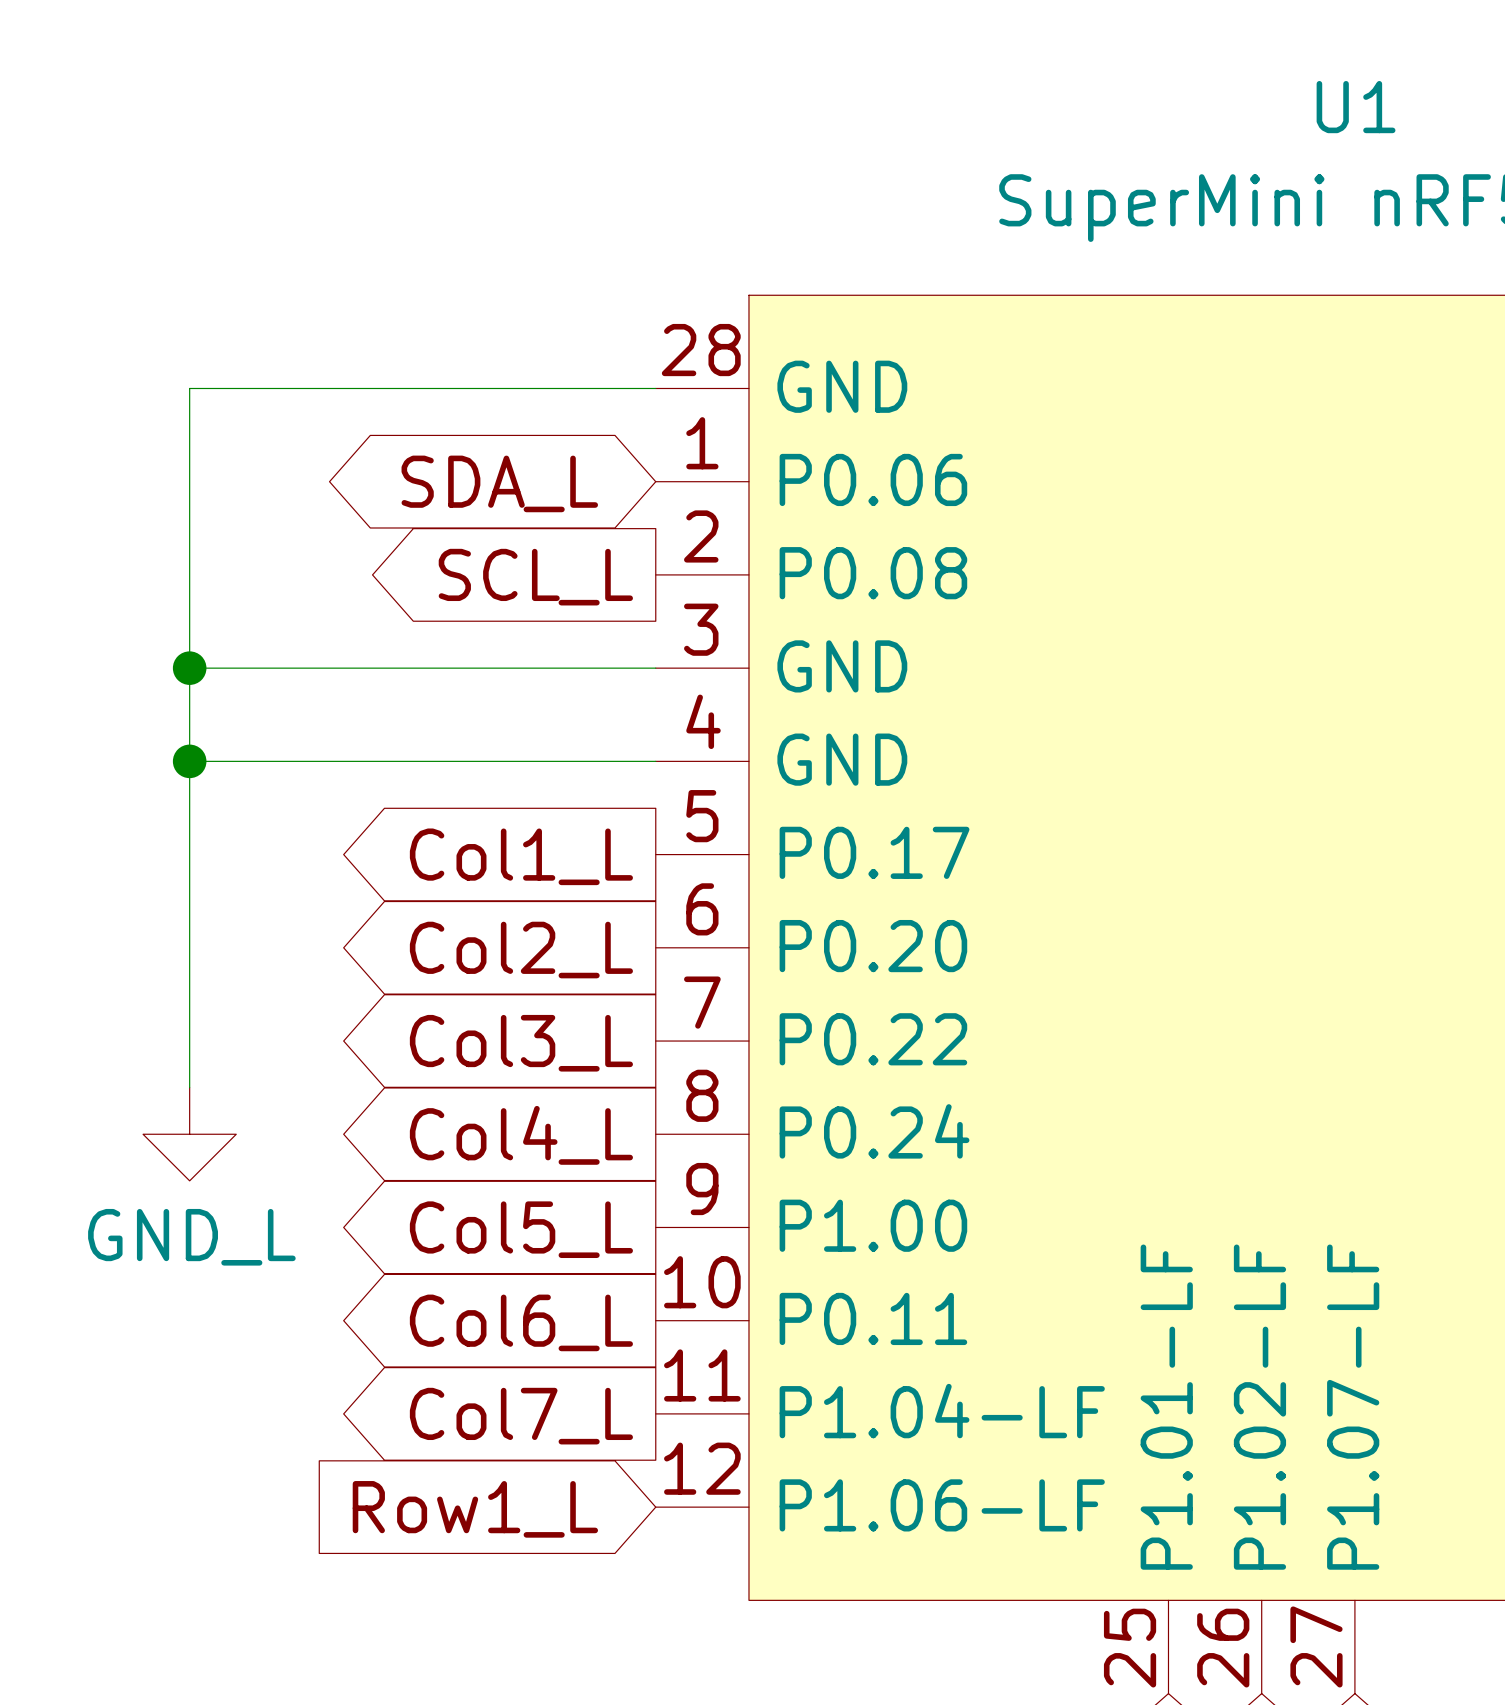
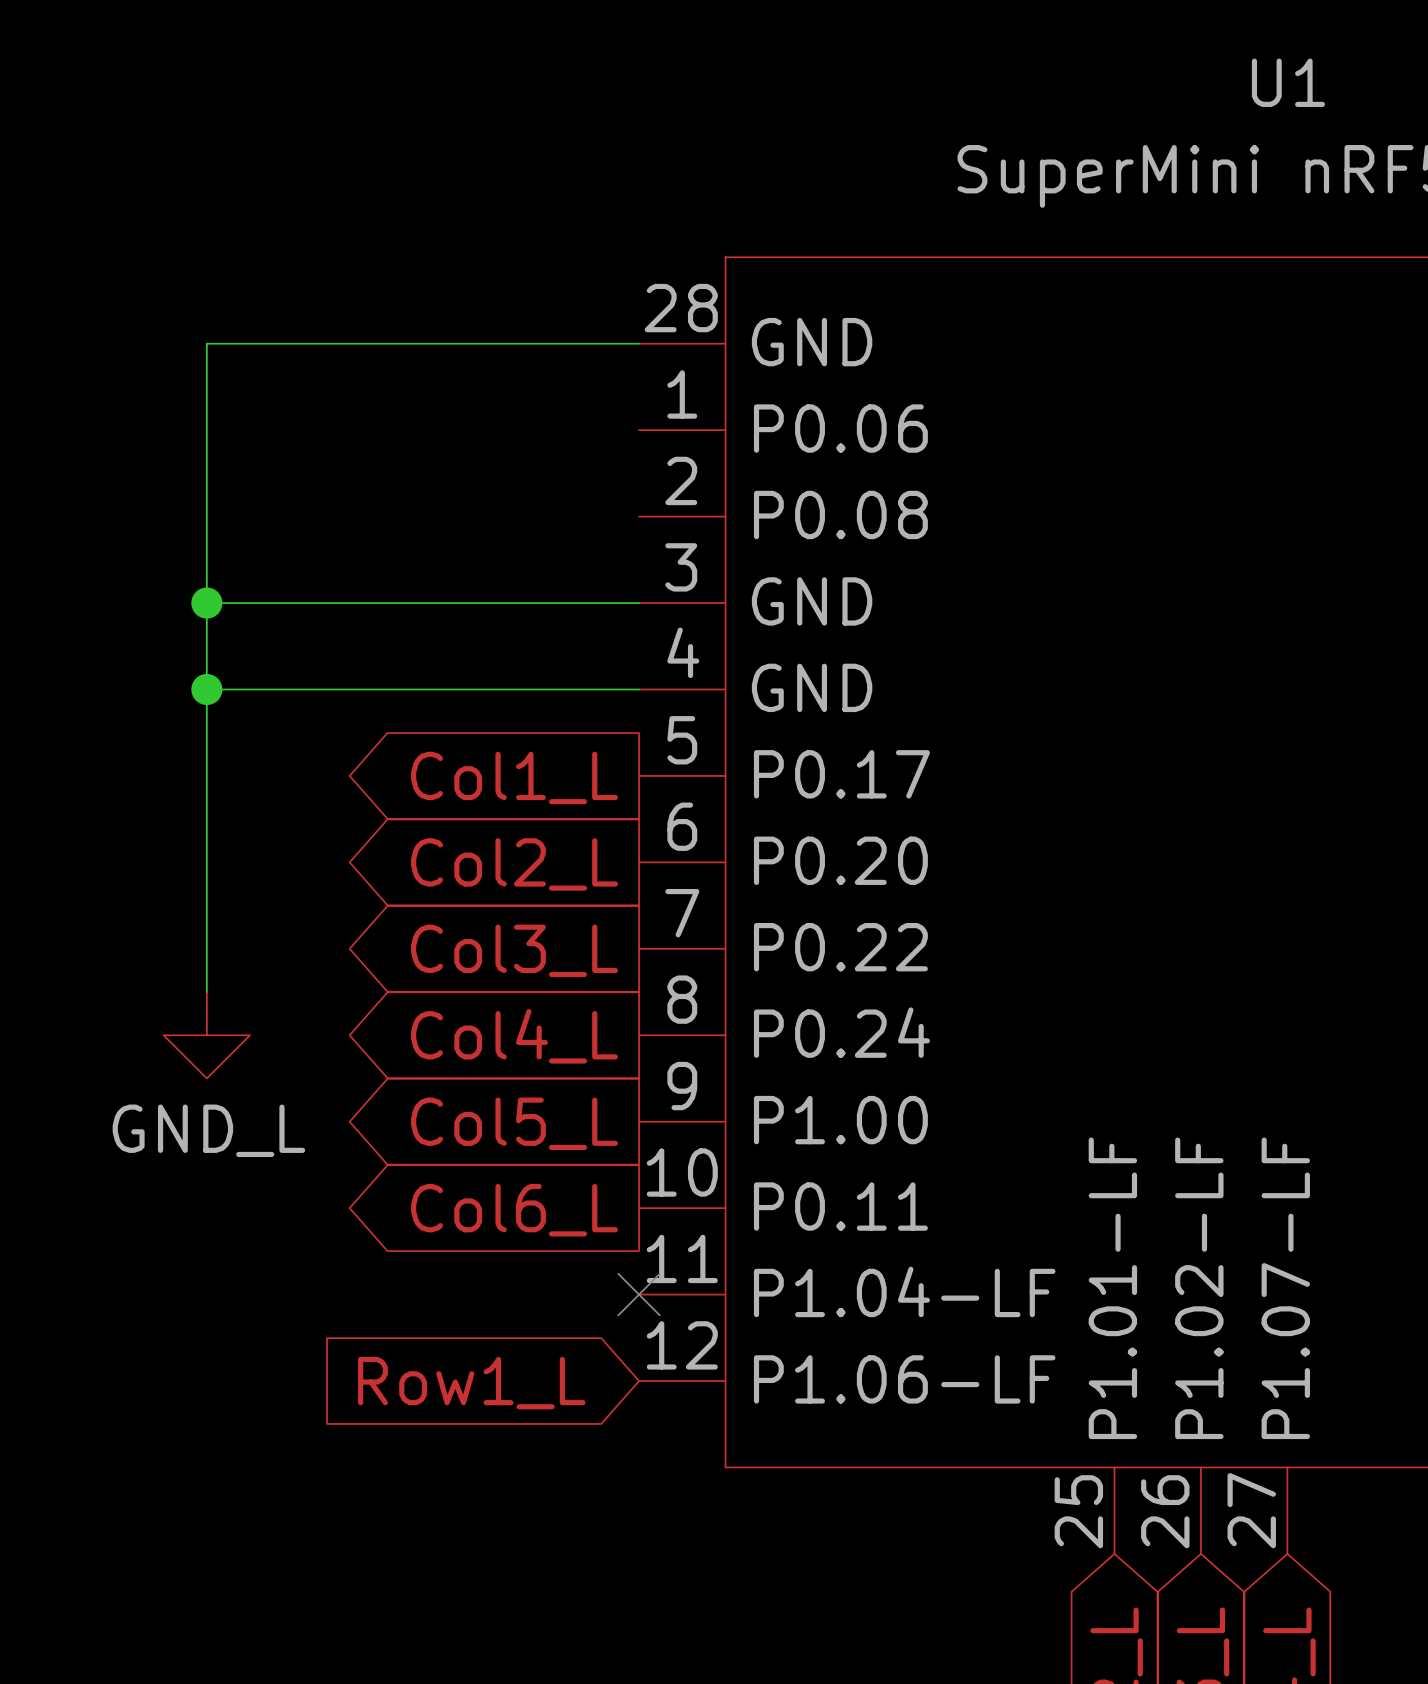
global label: SDA_L (499, 483) -> none
global label: SCL_L (535, 577) -> none
no-connect mark: none -> (639, 1294)
global label: Col7_L (521, 1416) -> none

